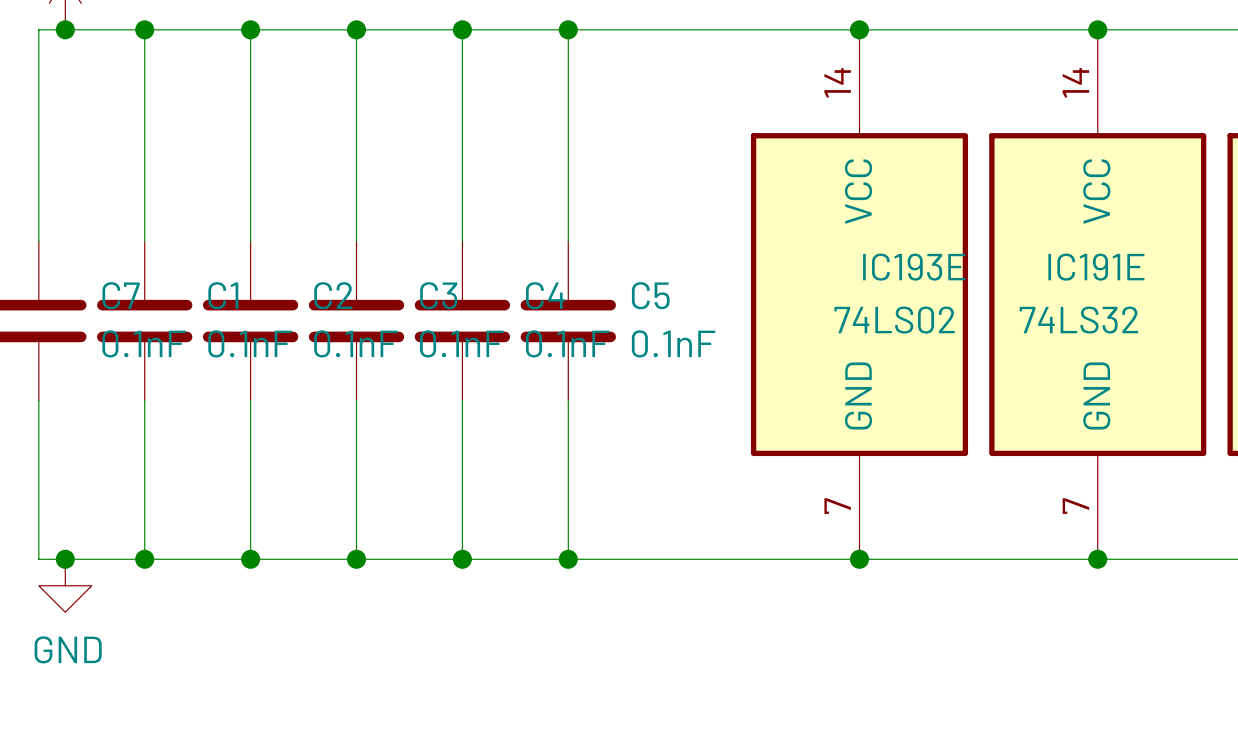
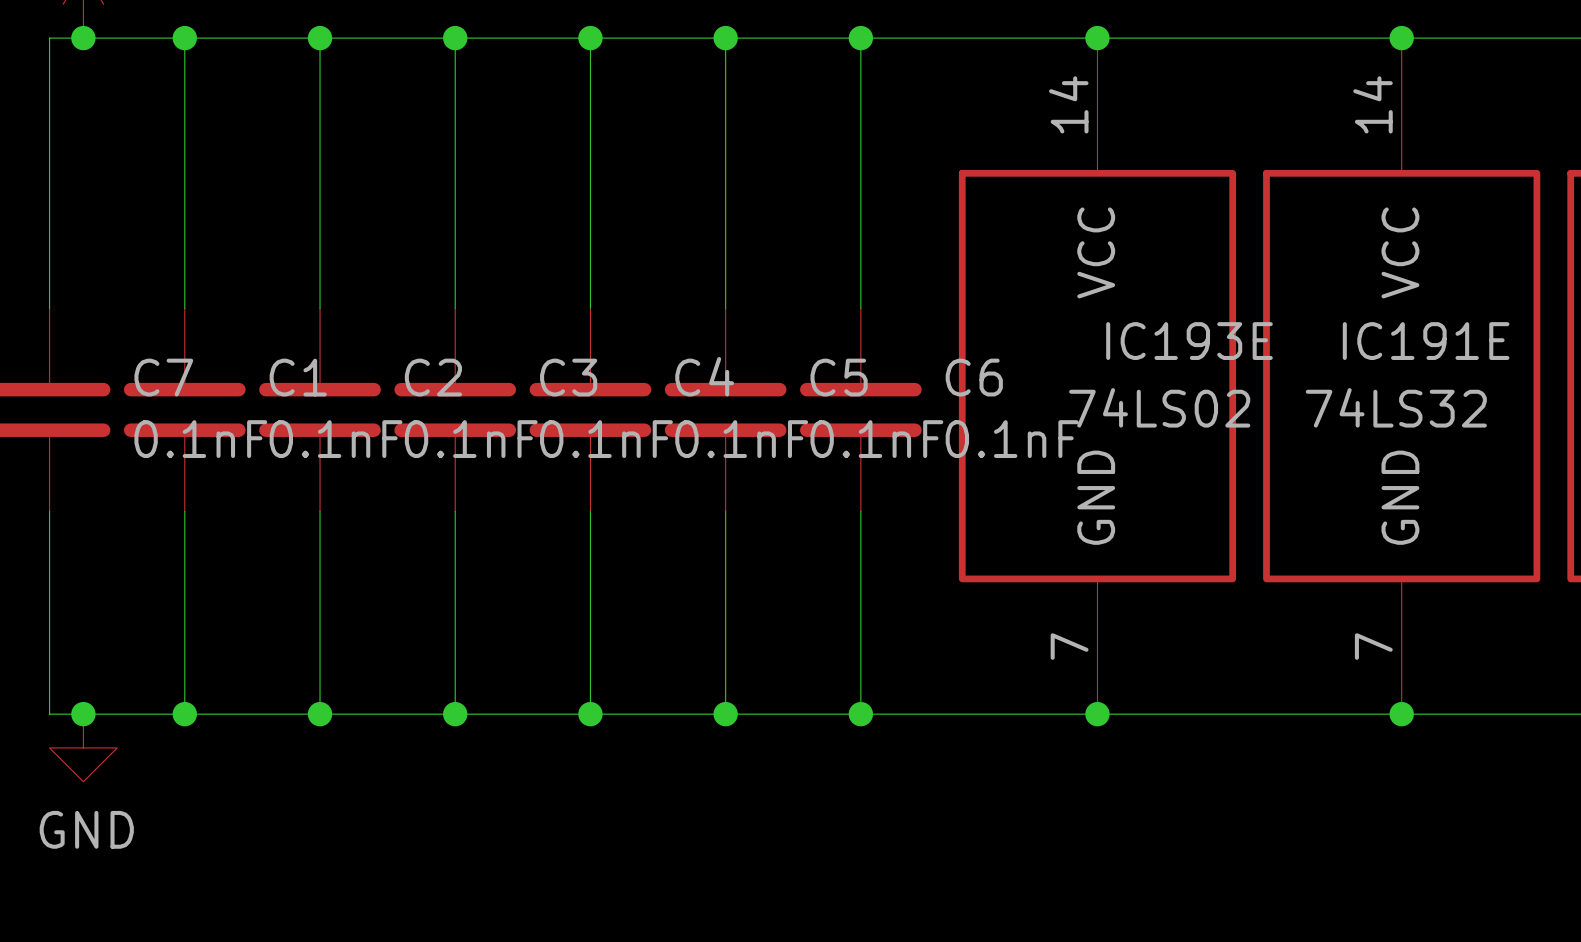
wire: none -> (860, 38) (860, 308)
junction: none -> (860, 38)
C6: none -> 0.1nF (860, 409)
wire: none -> (860, 511) (860, 714)
junction: none -> (860, 714)

